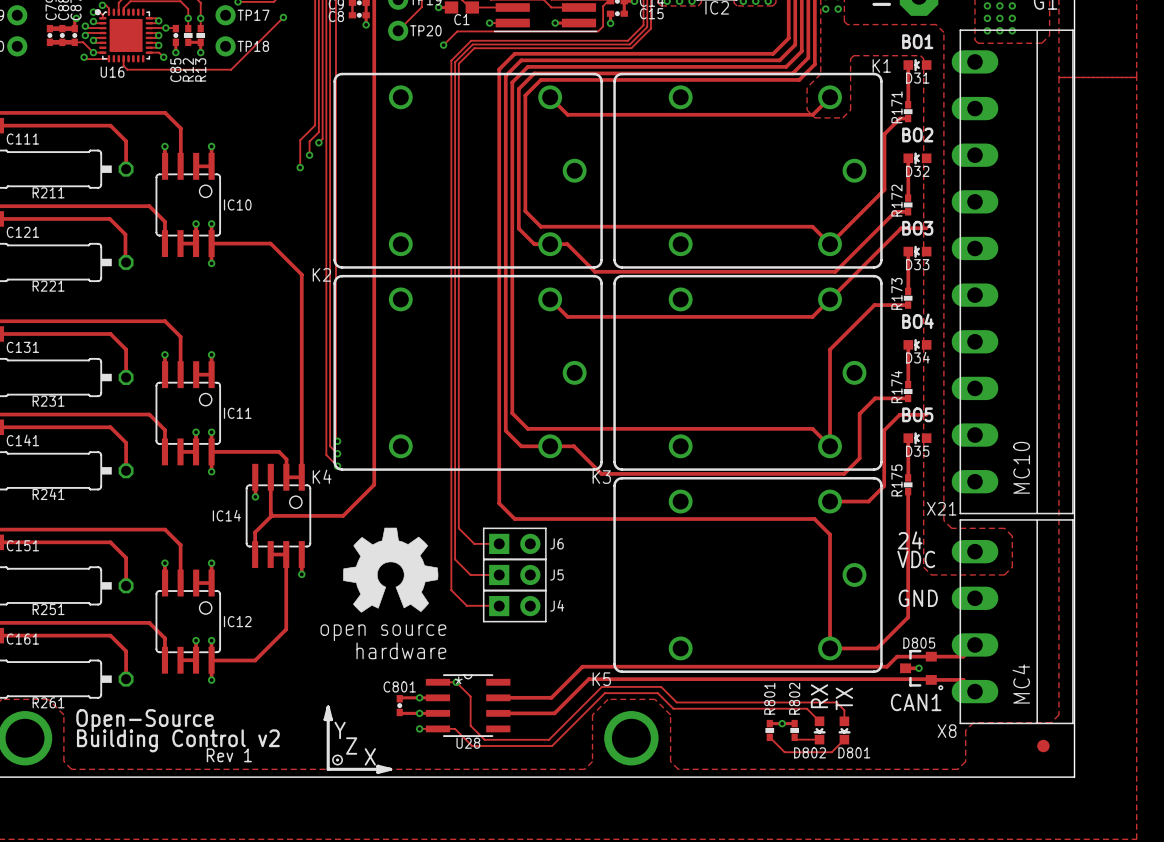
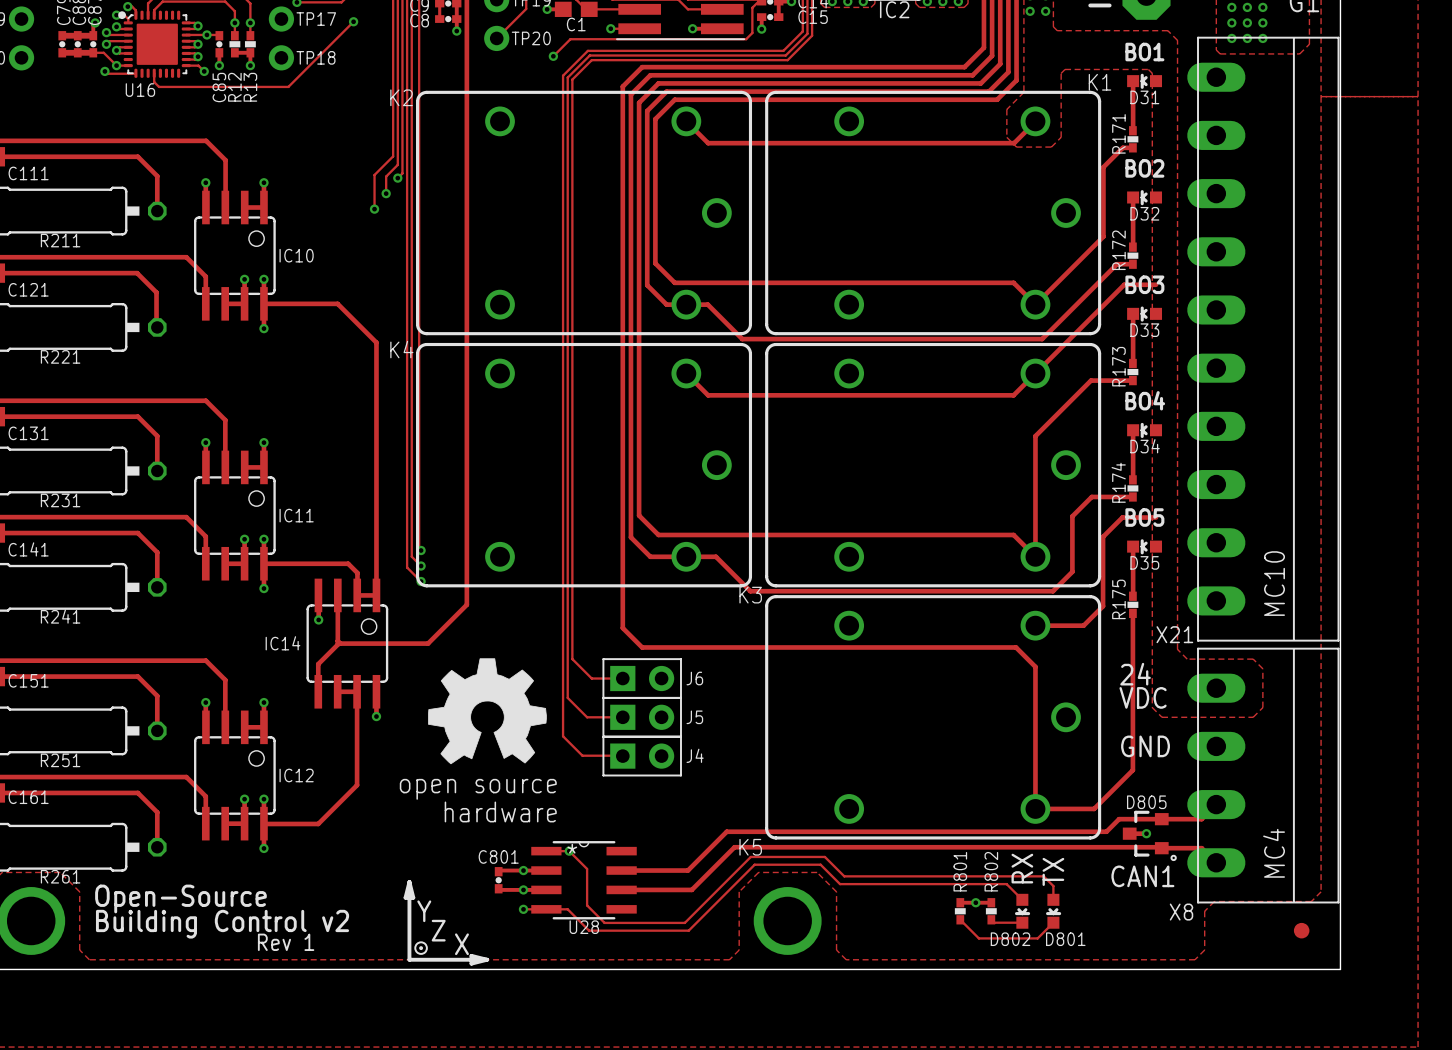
K2 name position: K2 (321, 274) -> K2 (401, 97)
K4 name position: K4 (322, 476) -> K4 (401, 349)

